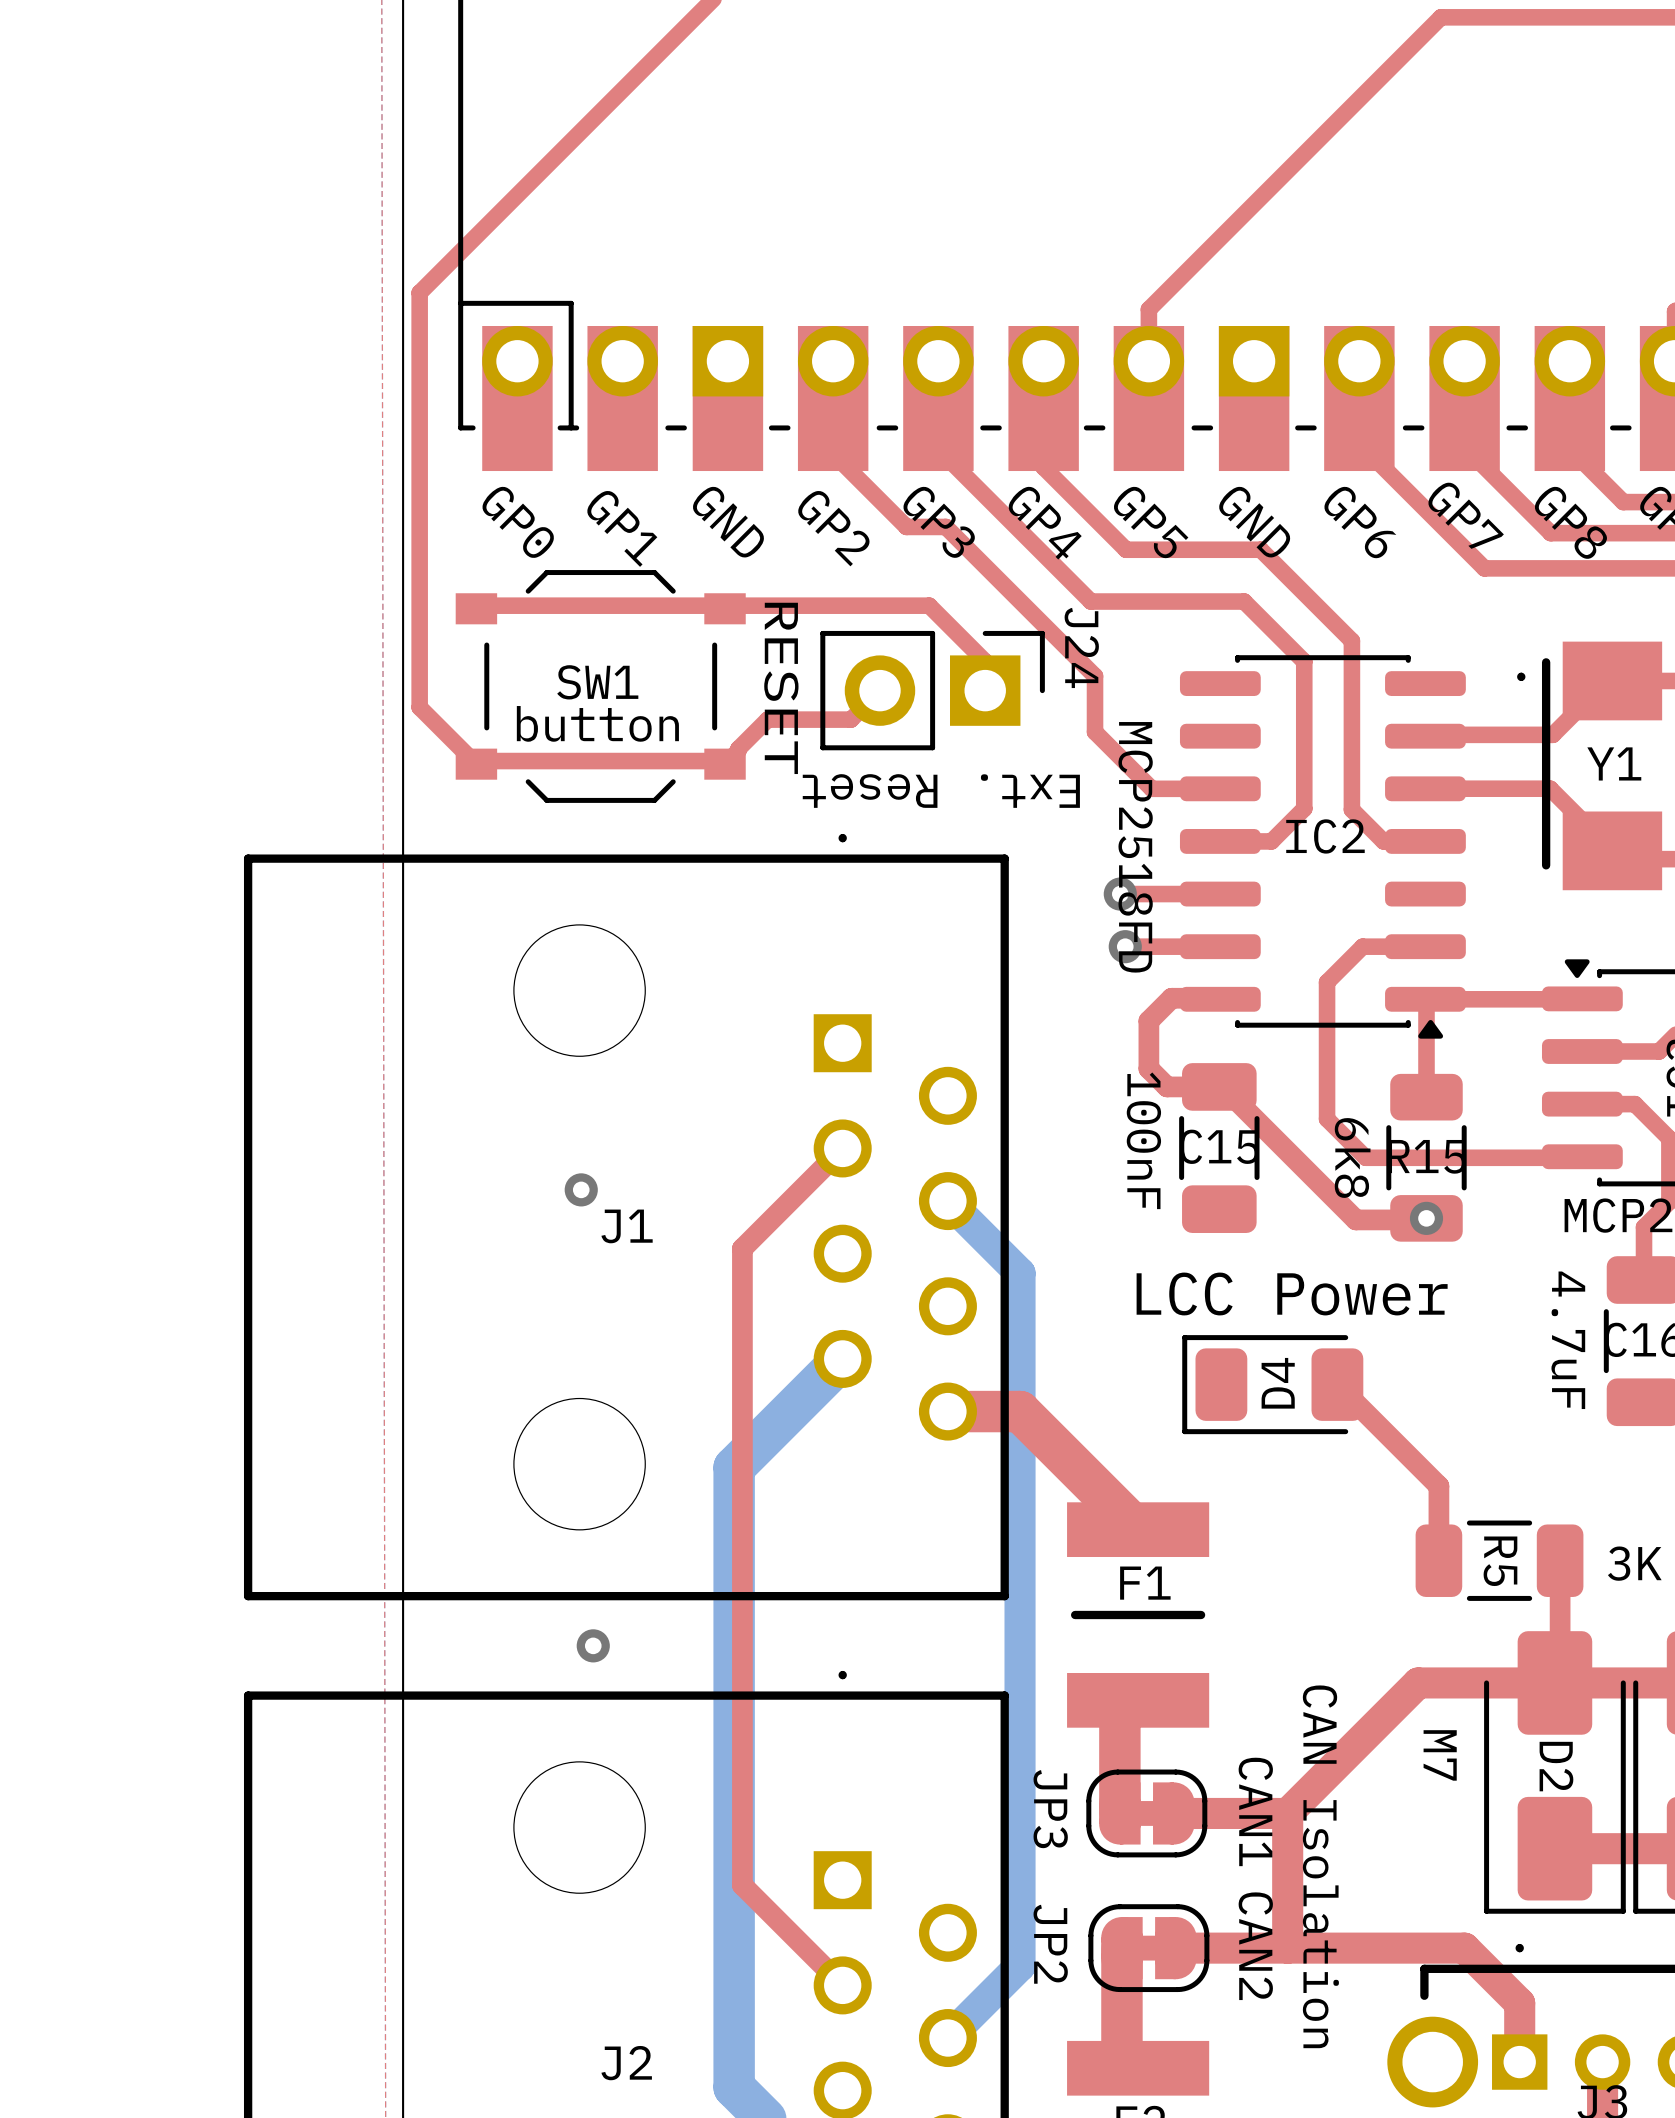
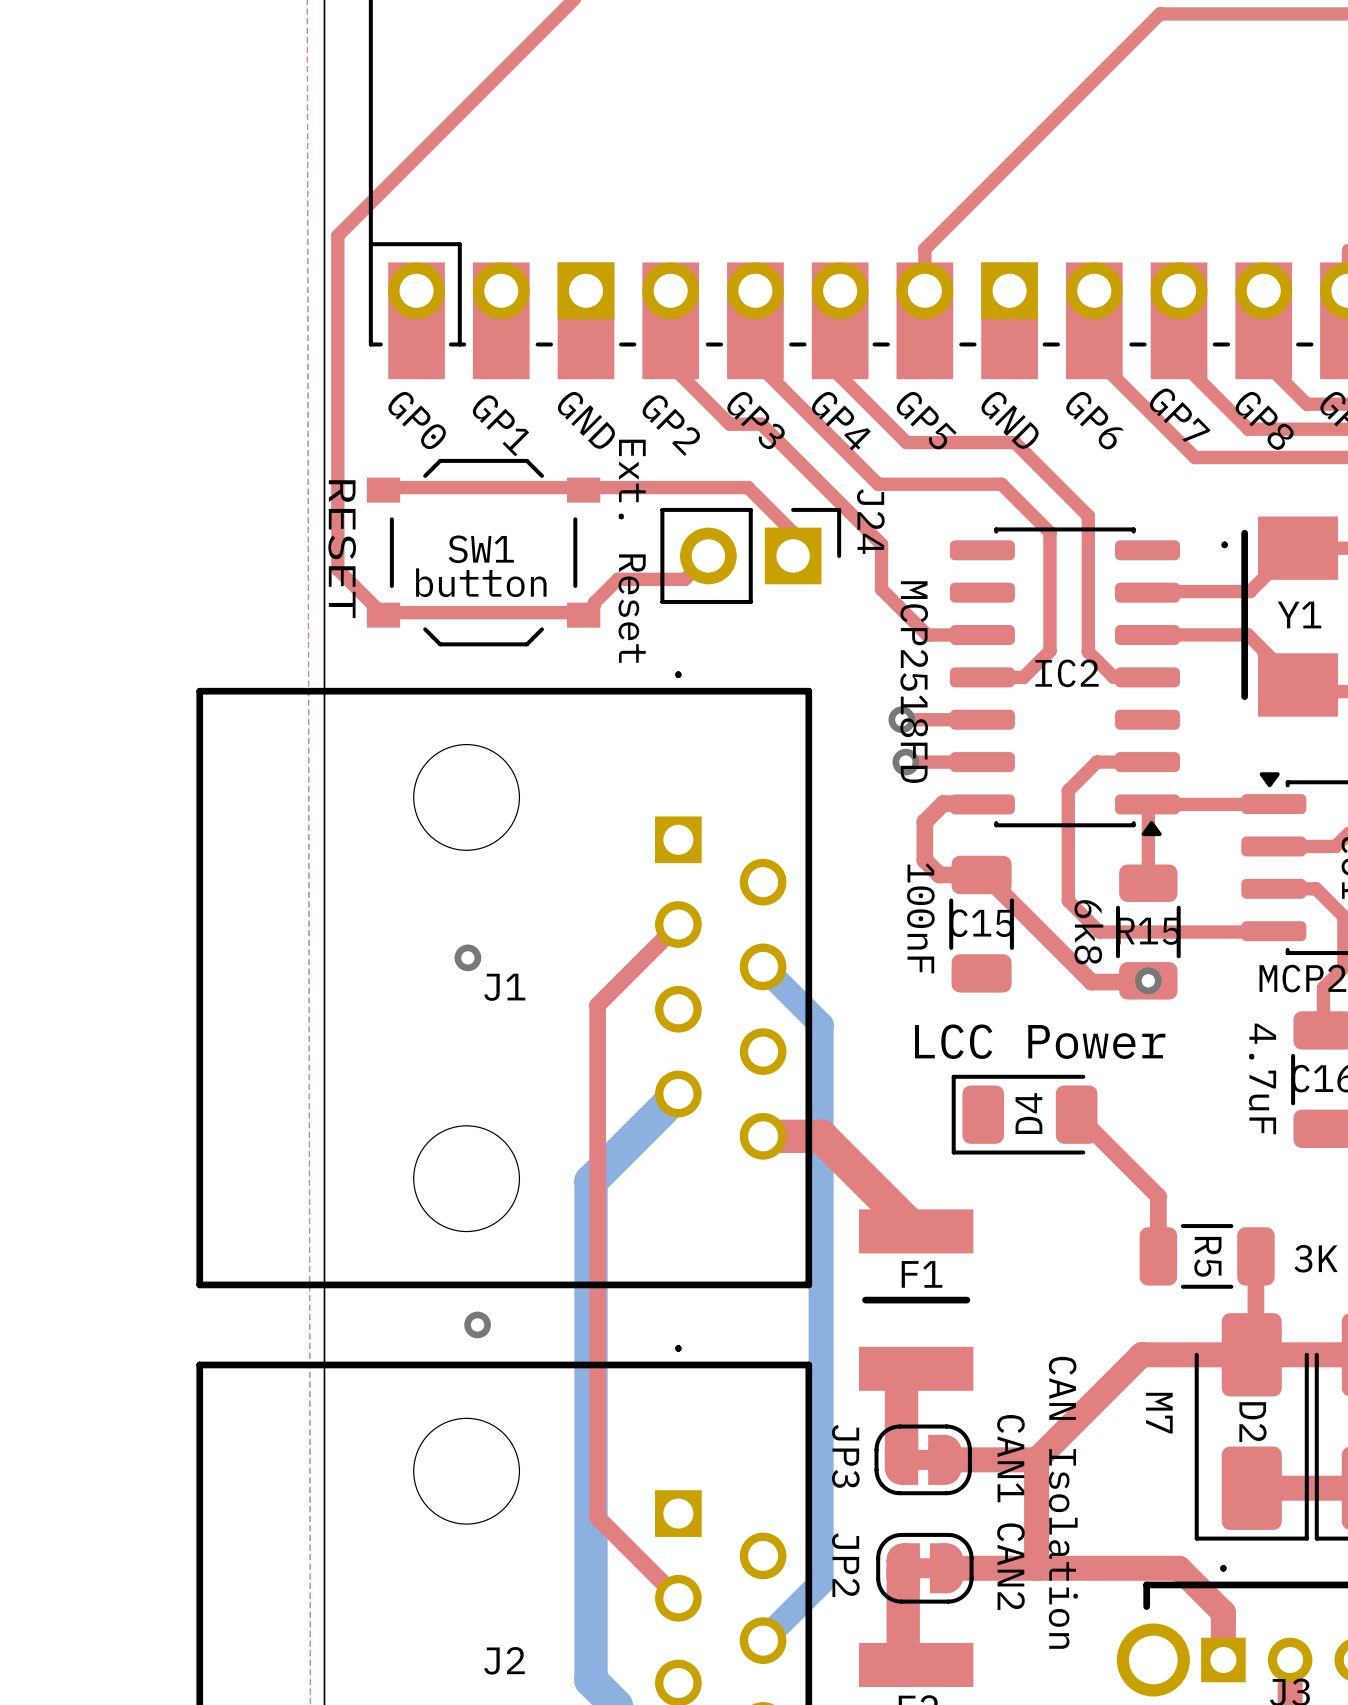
text position: RESET (781, 688) -> RESET (342, 549)
J24 value rotation: 0° (941, 791) -> 90° counterclockwise (632, 551)

